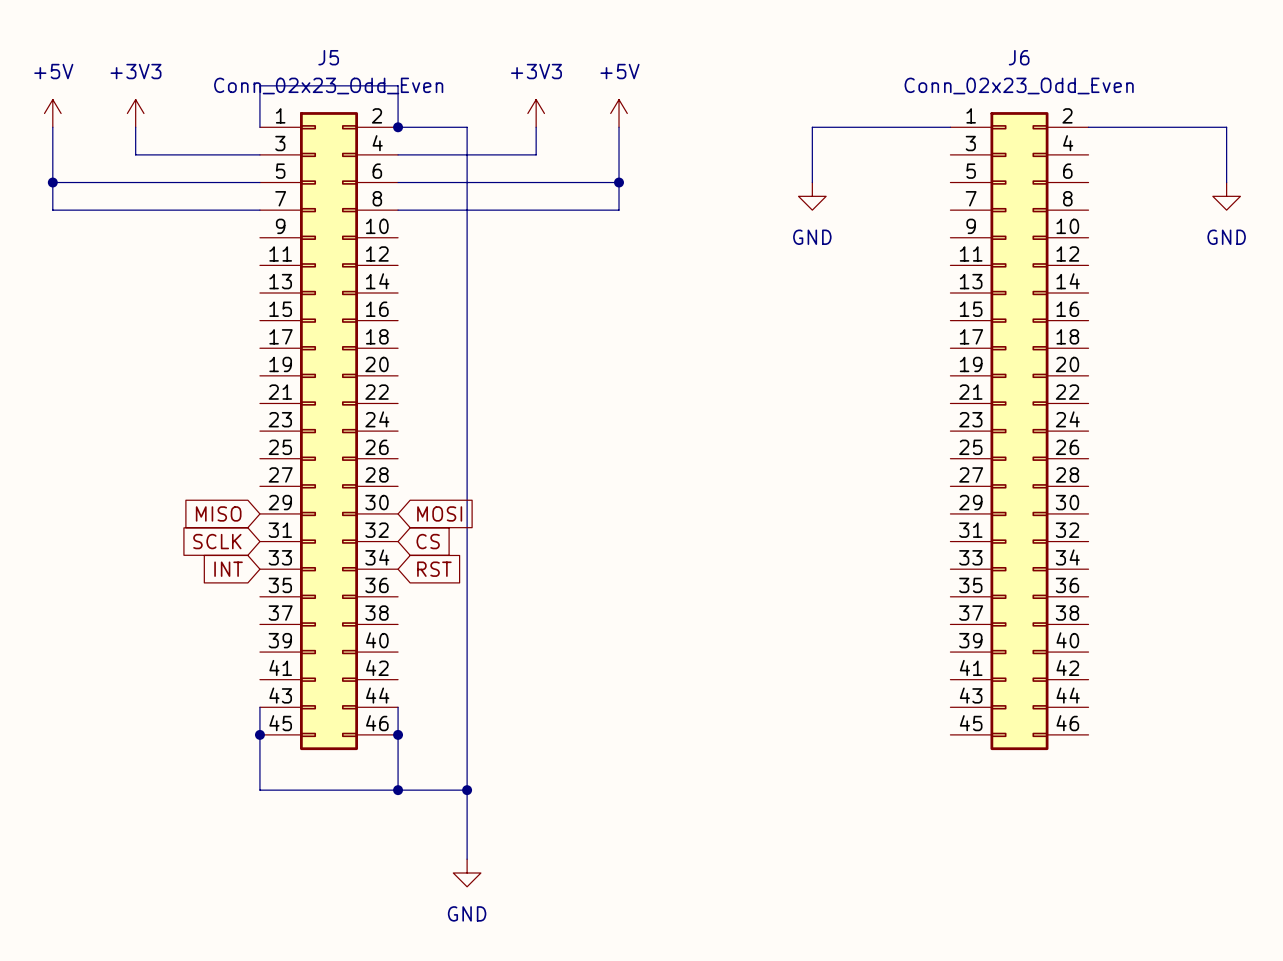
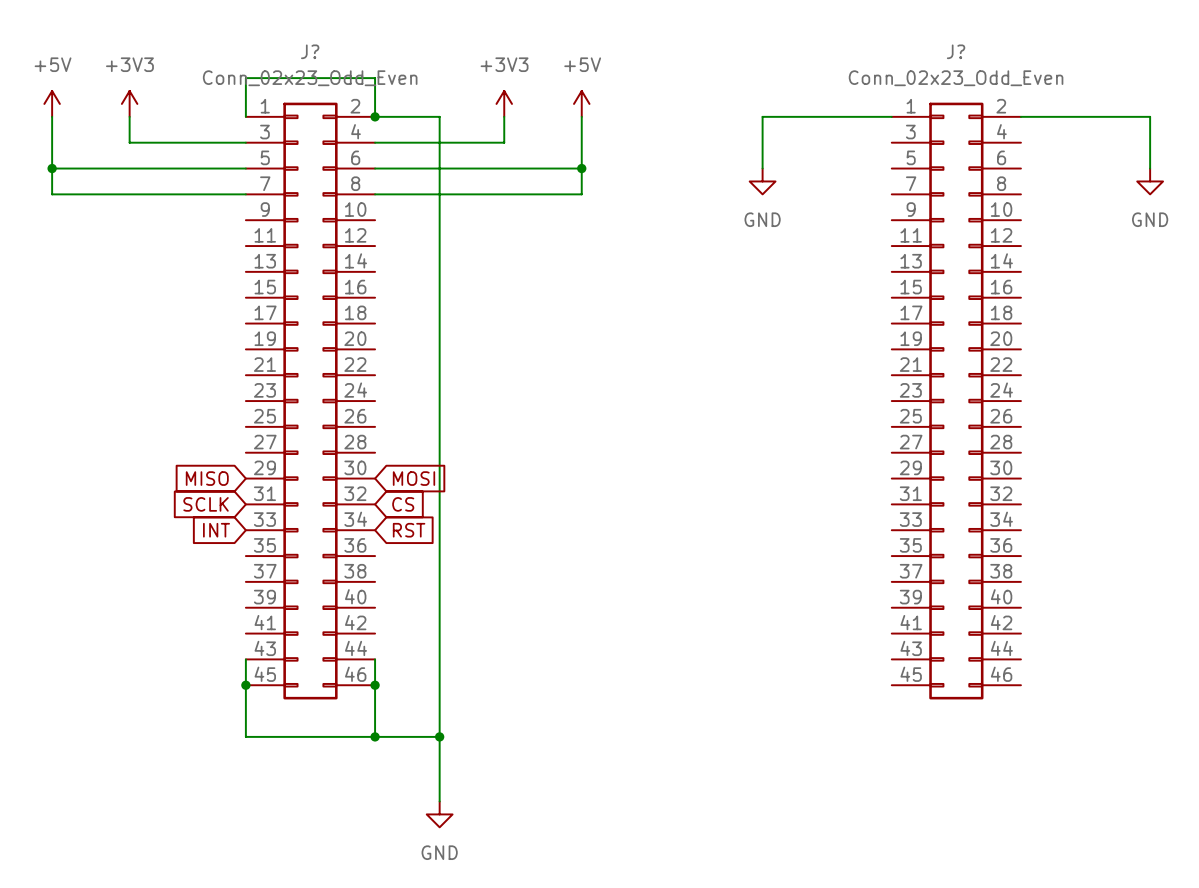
J5 name: J5 (328, 57) -> J? (310, 51)
J6 name: J6 (1019, 57) -> J? (956, 51)

